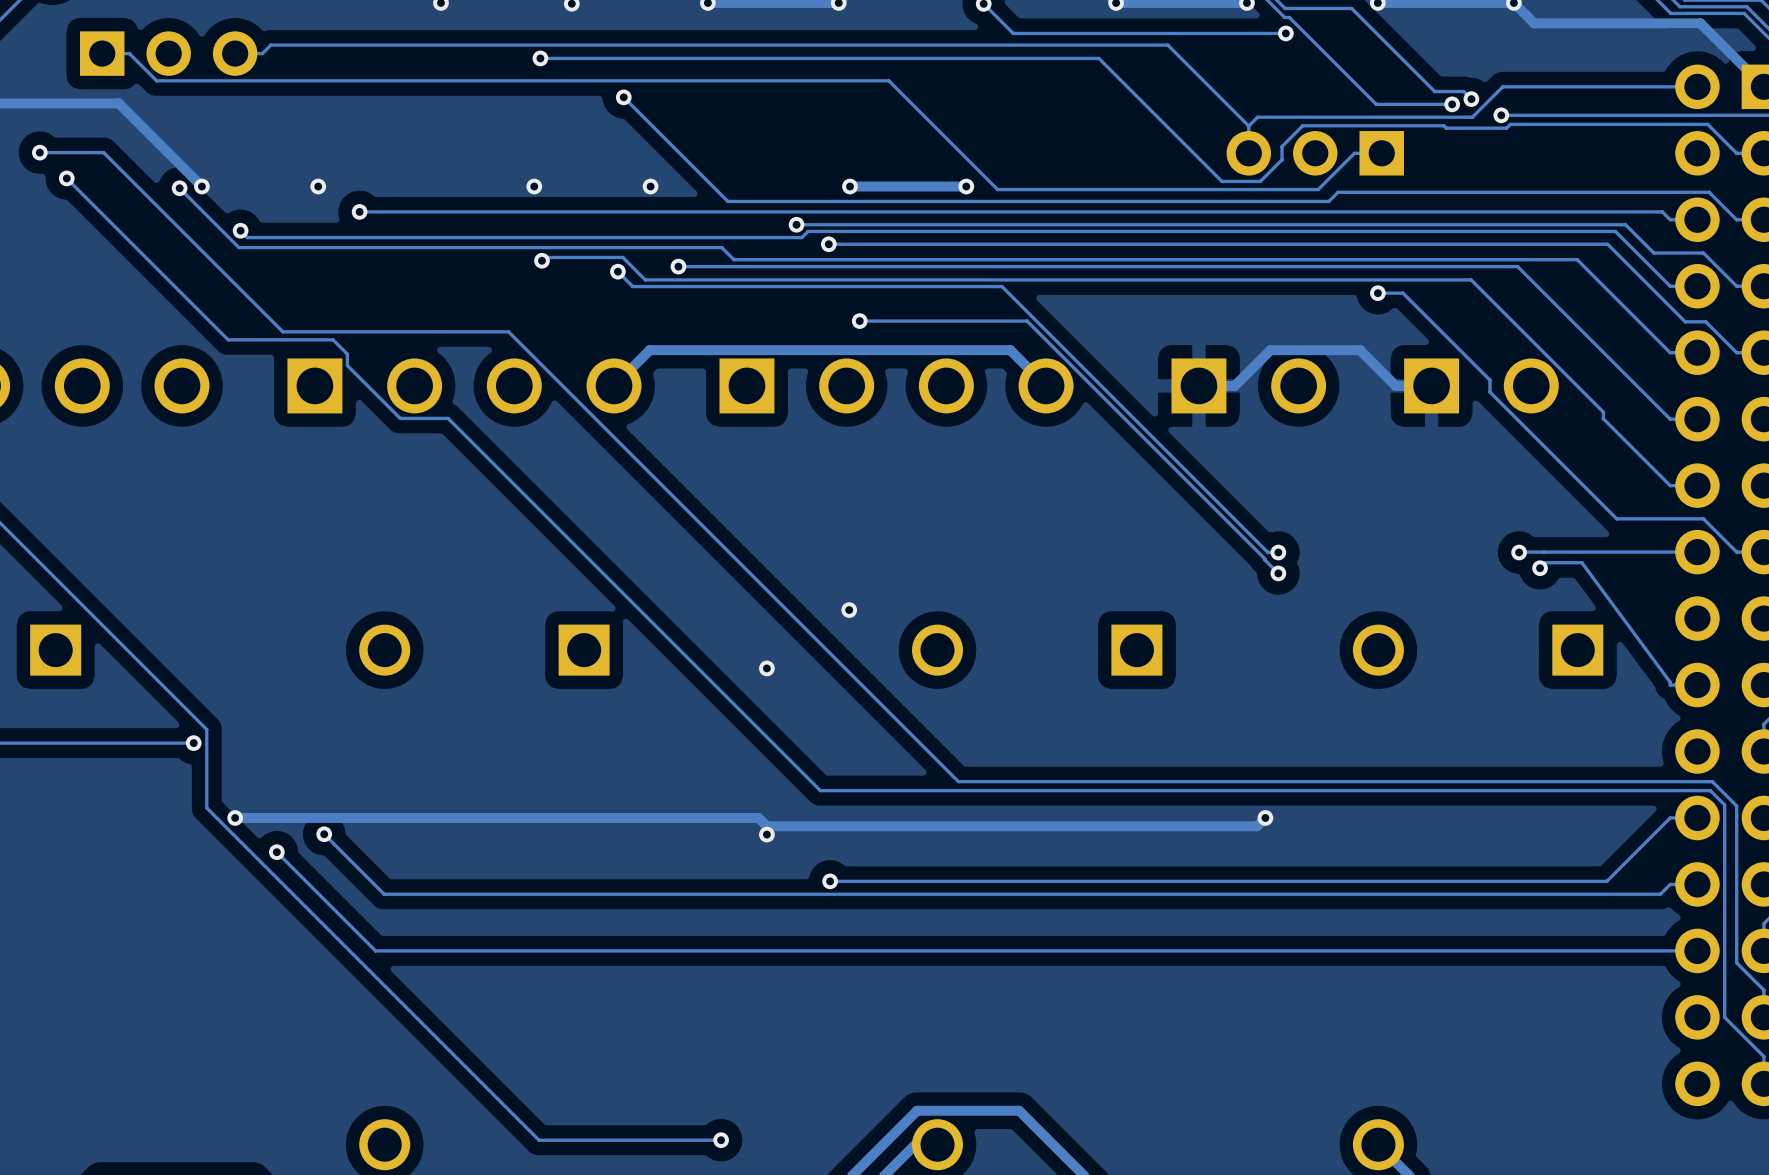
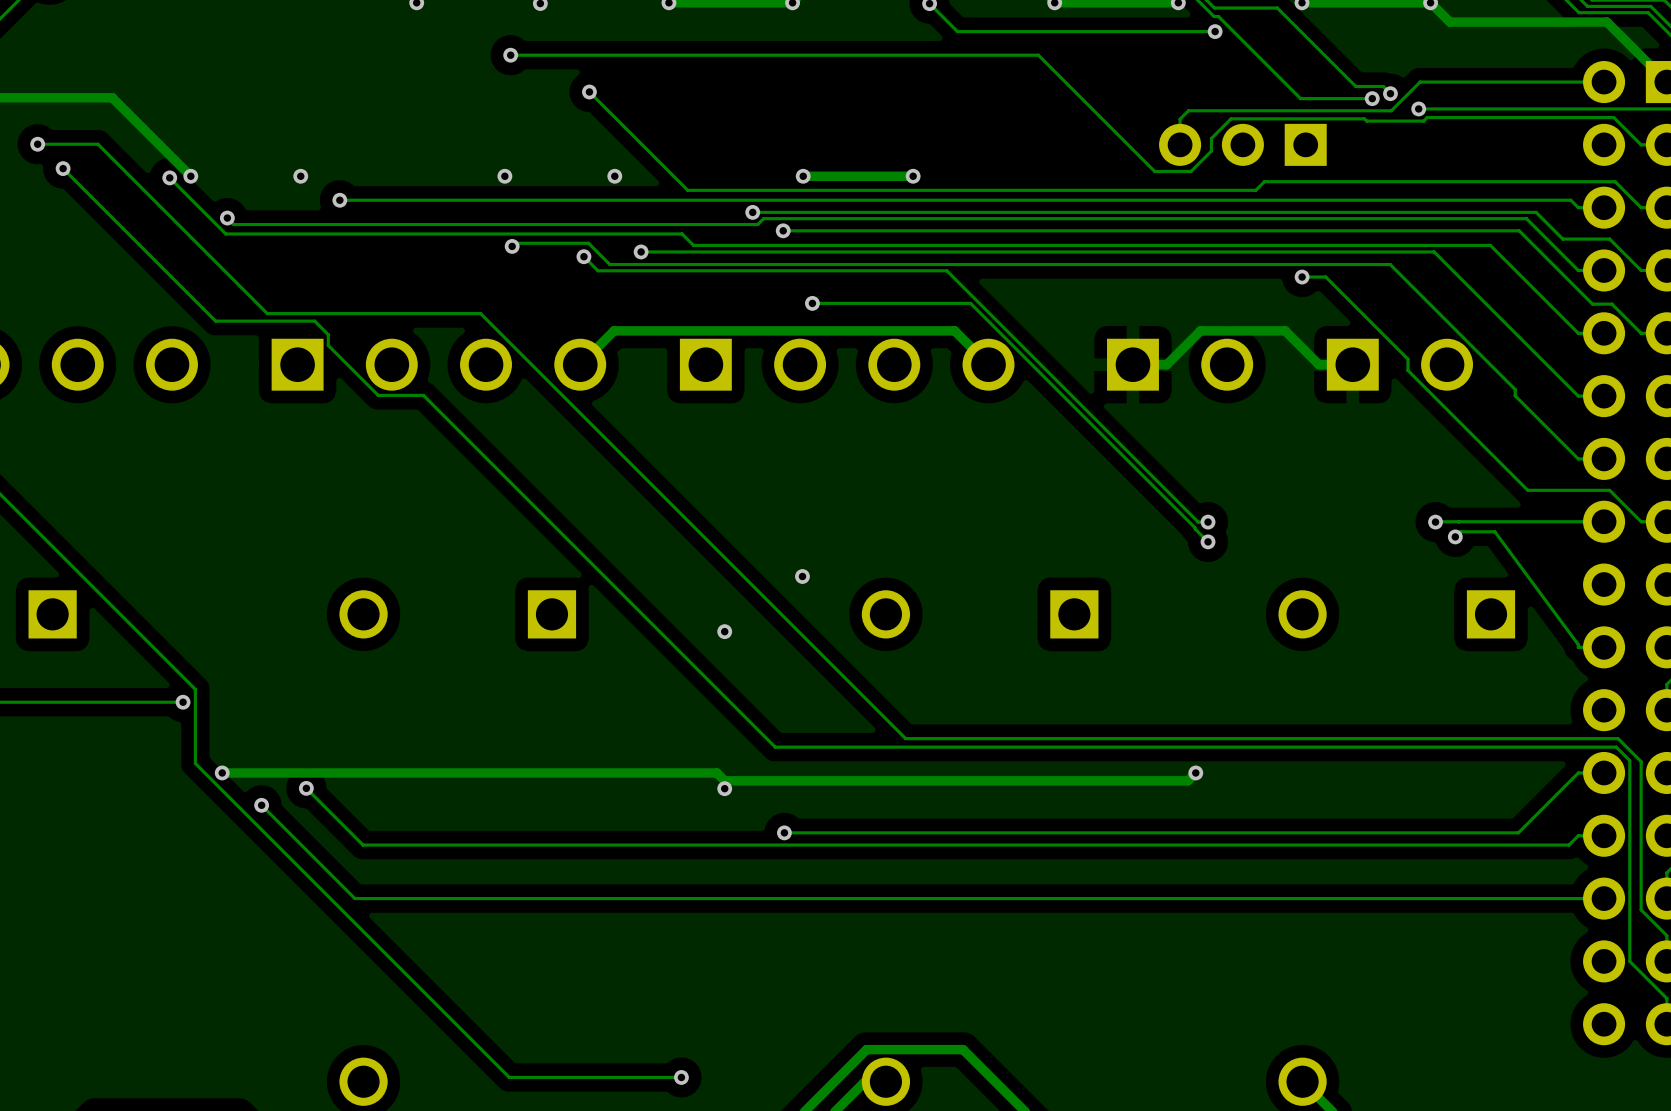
track: (102, 53) (129, 53) (156, 80) (888, 80) (997, 189) (1318, 189) (1354, 153) (1381, 153) -> none
part: (168, 53) -> none
track: (235, 53) (262, 53) (270, 45) (1167, 45) (1248, 126) -> none

